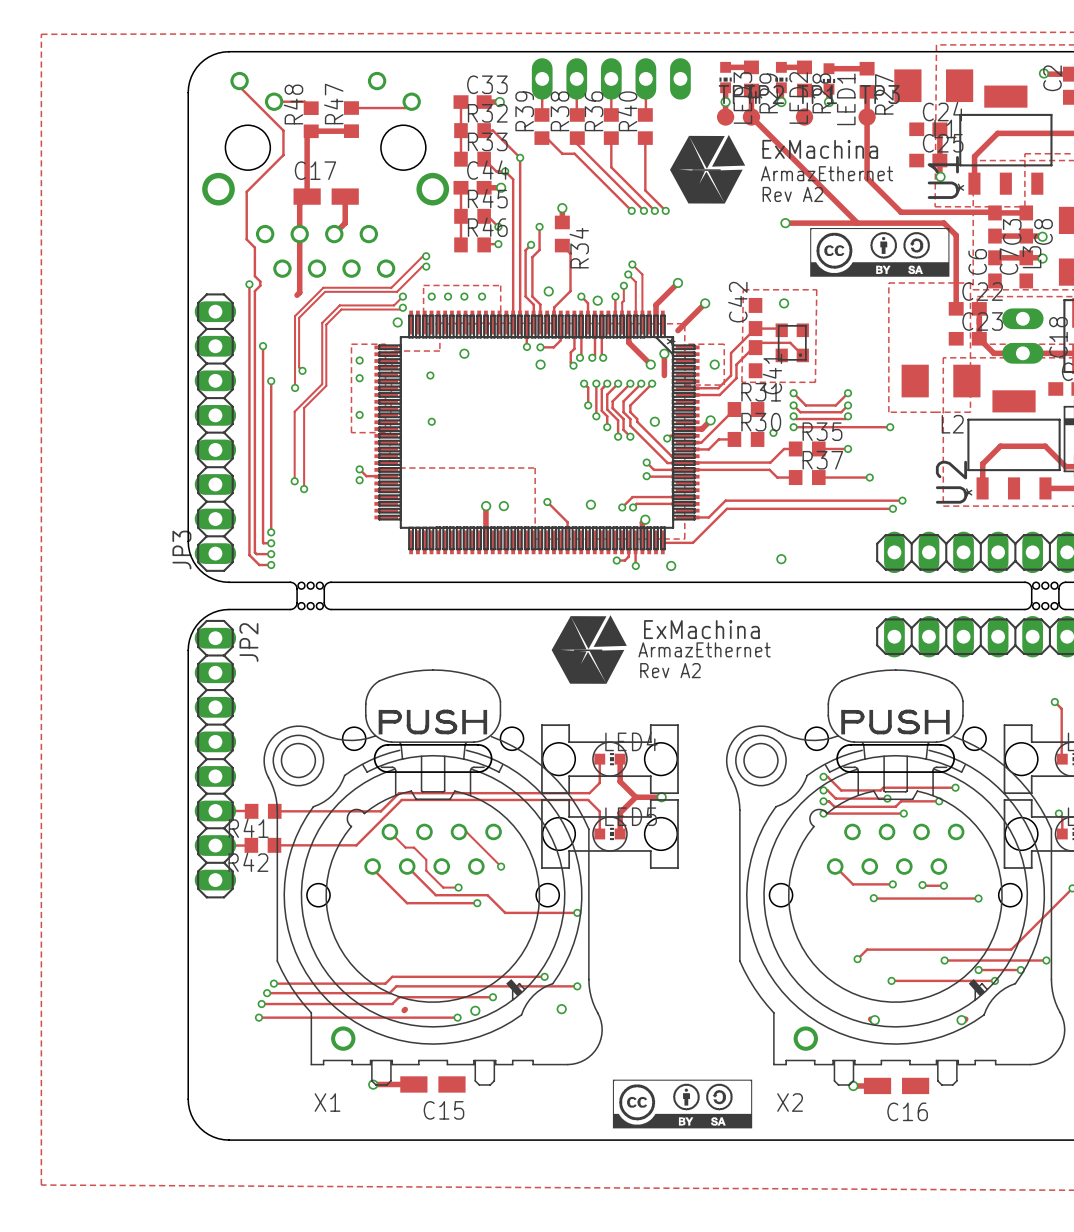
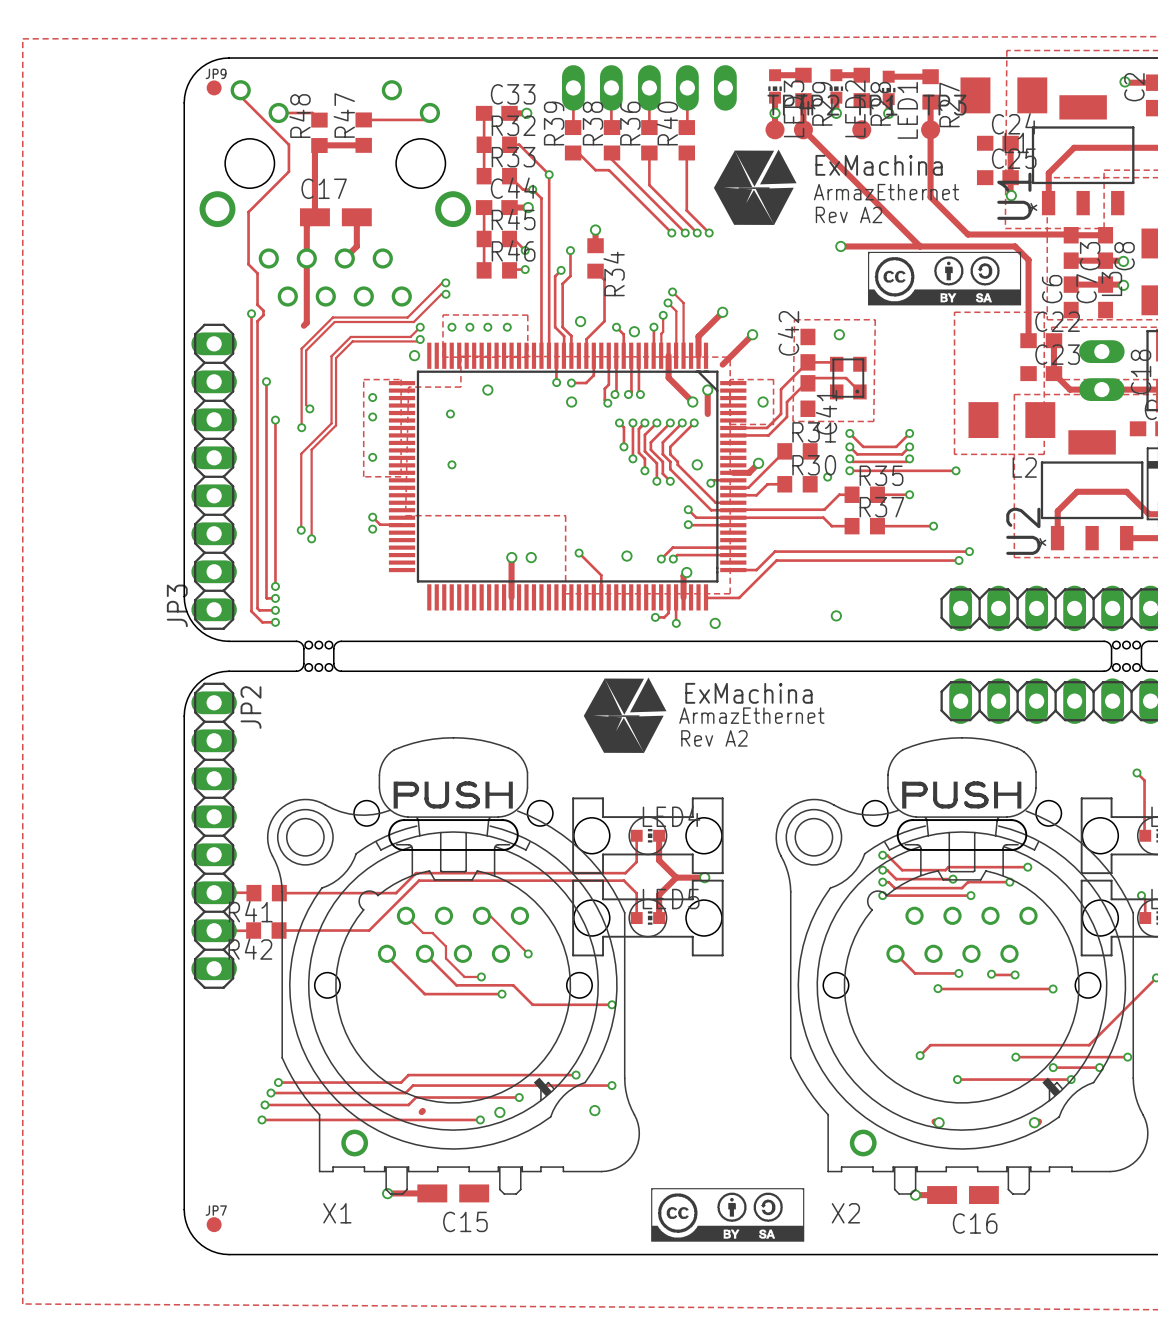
JP9: none -> (214, 87)
part footprint: [374, 310, 700, 555] -> [388, 342, 747, 611]
JP7: none -> (214, 1224)

